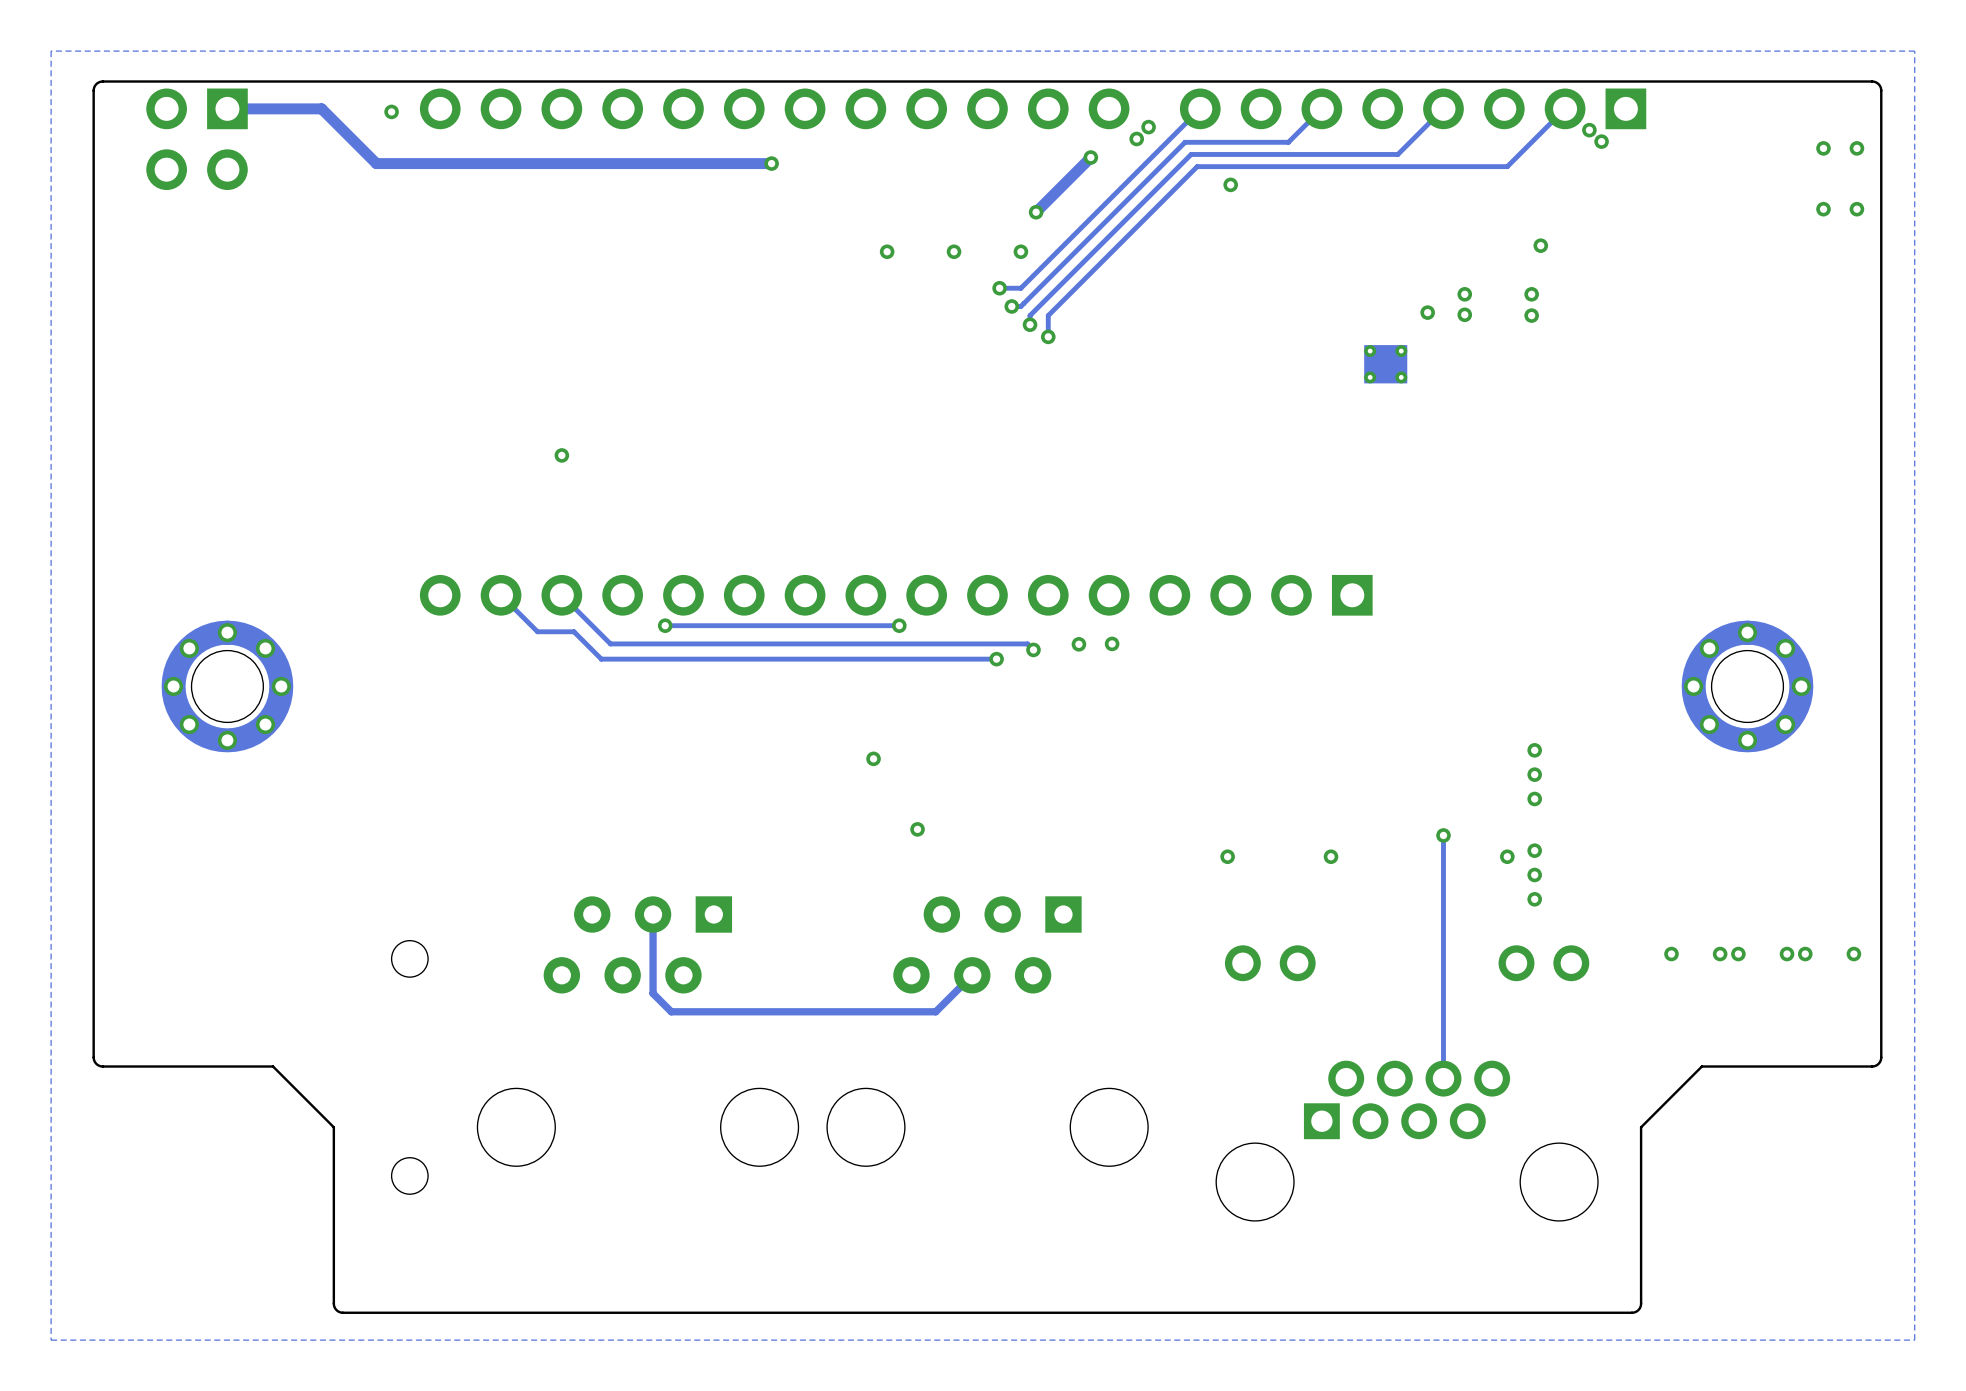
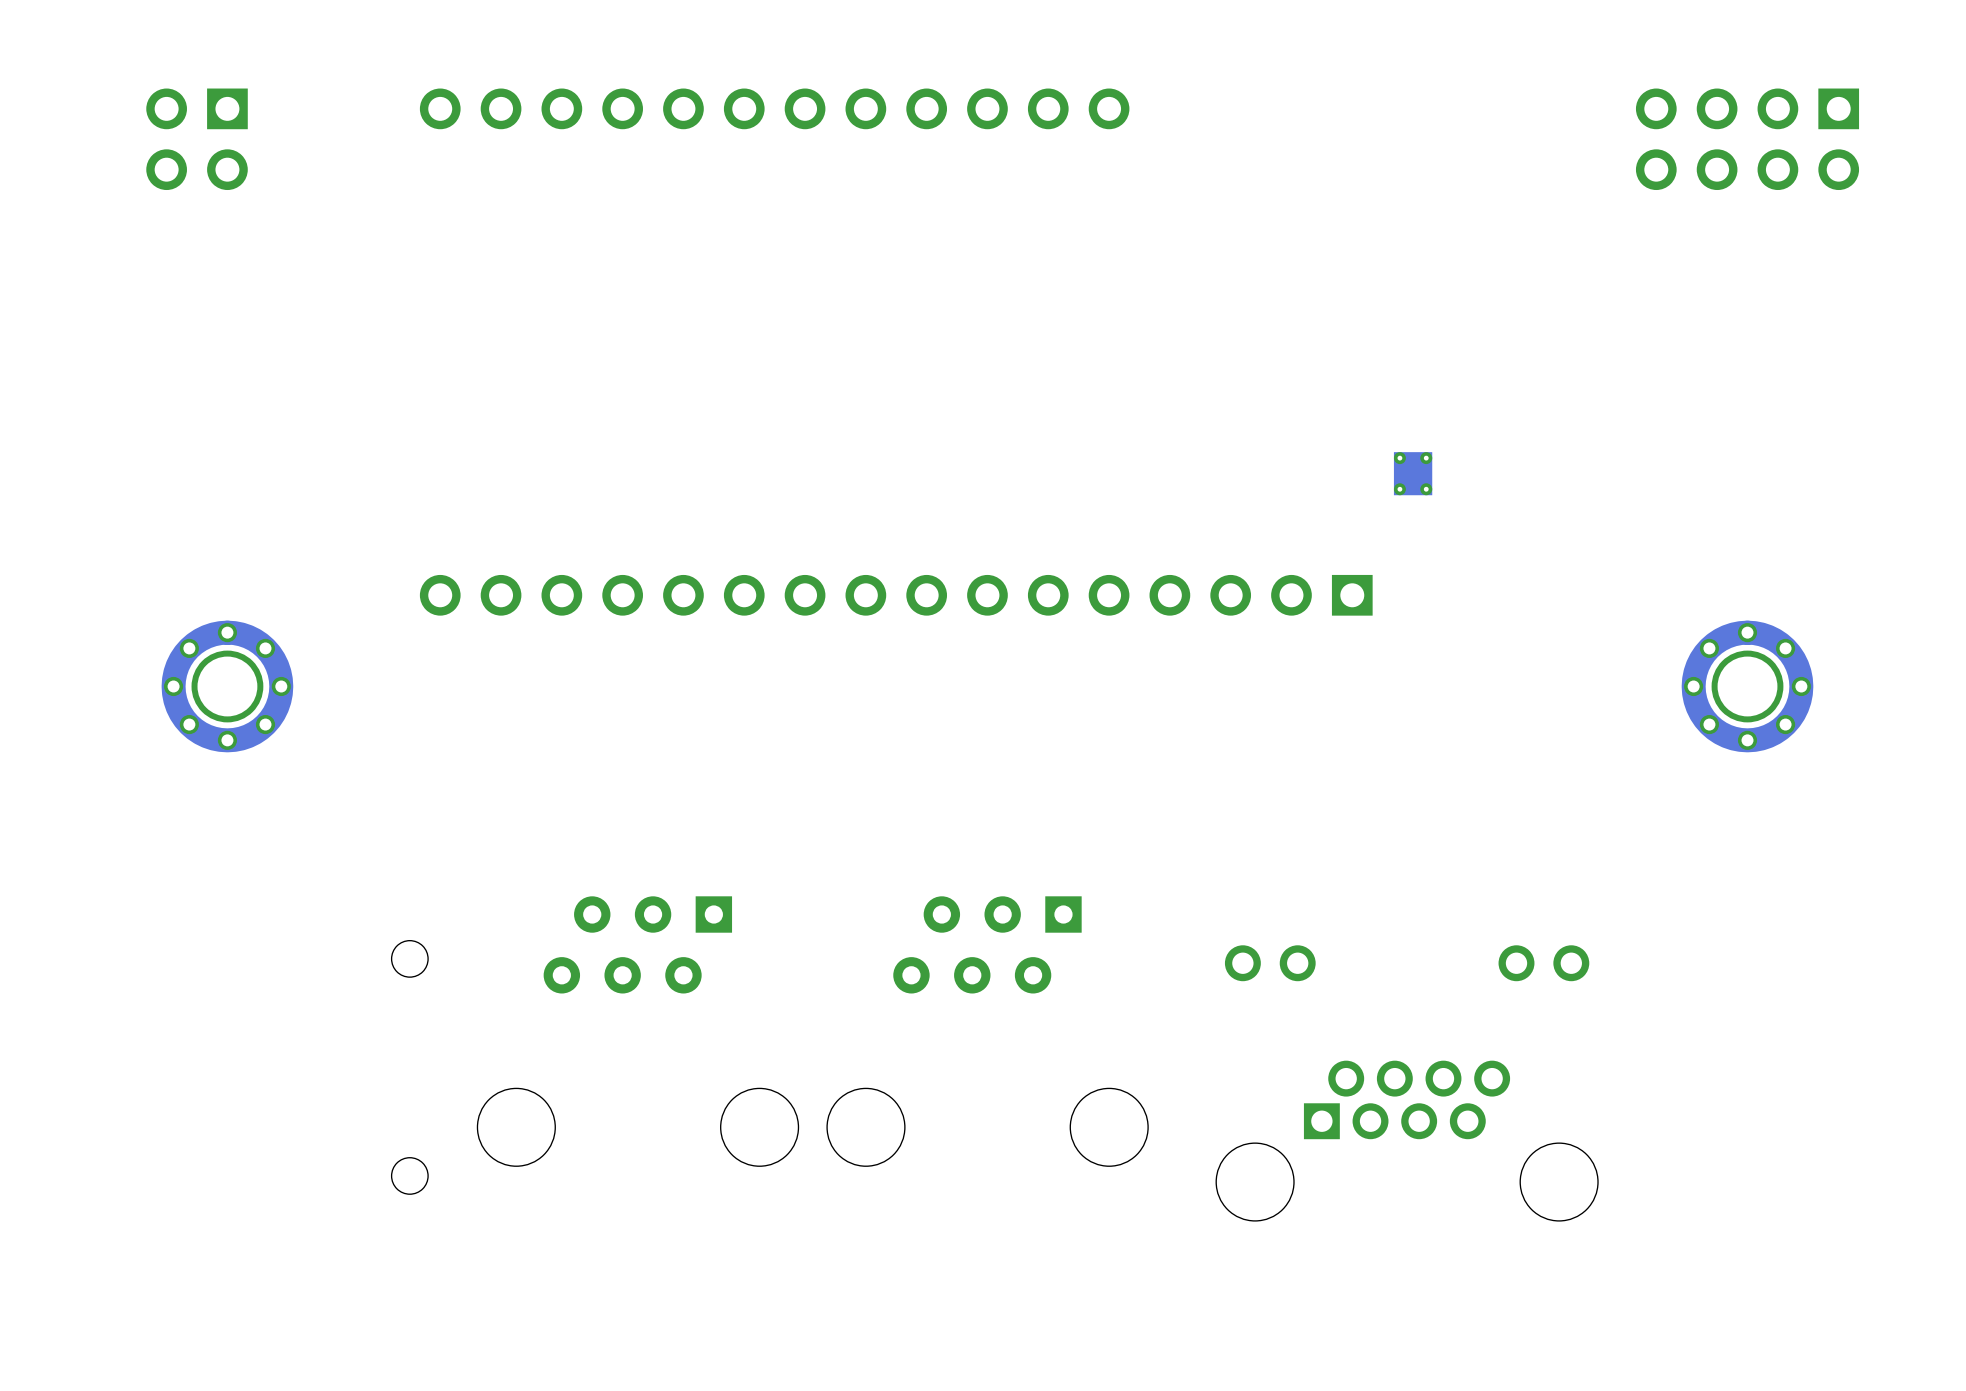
zone outline: (1914, 51) (1914, 1340) (51, 1340) (51, 51) (1914, 51) -> none
board edge: (1872, 81) (98, 82) (93, 90) (94, 1061) (102, 1066) (273, 1066) (333, 1127) (333, 1303) (335, 1309) (341, 1312) (1636, 1311) (1641, 1303) (1641, 1127) (1701, 1066) (1872, 1066) (1878, 1063) (1881, 1058) (1881, 90) (1878, 84) (1872, 81) -> none
track: (227, 108) (321, 108) (376, 163) (771, 163) -> none
track: (1200, 108) (1020, 288) (999, 288) -> none
track: (1321, 108) (1288, 142) (1185, 142) (1020, 306) (1011, 306) -> none
part: (1413, 108) -> none
track: (1443, 108) (1397, 154) (1191, 154) (1030, 315) (1030, 324) -> none
track: (1565, 108) (1507, 166) (1197, 166) (1048, 315) (1048, 336) -> none
via: (391, 111) -> none
via: (1148, 127) -> none
via: (1589, 130) -> none
via: (1136, 138) -> none
part: none -> (1747, 139)
via: (1601, 141) -> none
via: (1823, 148) -> none
via: (1856, 148) -> none
track: (1090, 157) (1036, 212) -> none
via: (1090, 157) -> none
via: (771, 163) -> none
via: (1230, 184) -> none
via: (1823, 209) -> none
via: (1856, 209) -> none
via: (1036, 212) -> none
via: (1540, 245) -> none
via: (887, 251) -> none
via: (954, 251) -> none
via: (1020, 251) -> none
via: (999, 288) -> none
via: (1464, 294) -> none
via: (1531, 294) -> none
via: (1011, 306) -> none
via: (1427, 312) -> none
via: (1464, 314) -> none
via: (1531, 315) -> none
via: (1030, 324) -> none
via: (1048, 336) -> none
part rotation: 0° (1385, 364) -> 90° clockwise (1413, 473)
part position: (1385, 364) -> (1413, 473)
via: (561, 455) -> none
track: (501, 595) (537, 631) (574, 631) (601, 659) (996, 659) -> none
track: (561, 595) (610, 643) (1027, 643) (1033, 649) -> none
part footprint: [161, 620, 294, 753] -> [161, 620, 294, 753]
part footprint: [1681, 620, 1814, 753] -> [1681, 620, 1814, 753]
via: (665, 625) -> none
track: (899, 625) (665, 625) -> none
via: (899, 625) -> none
via: (1112, 643) -> none
via: (1078, 644) -> none
via: (1033, 649) -> none
via: (996, 659) -> none
via: (1534, 750) -> none
via: (873, 758) -> none
via: (1534, 774) -> none
via: (1534, 798) -> none
via: (917, 829) -> none
track: (1443, 835) (1443, 1084) -> none
via: (1443, 835) -> none
via: (1534, 850) -> none
via: (1227, 856) -> none
via: (1331, 856) -> none
via: (1507, 856) -> none
via: (1534, 874) -> none
via: (1534, 899) -> none
track: (653, 914) (653, 993) (671, 1011) (935, 1011) (972, 975) -> none
via: (1671, 954) -> none
via: (1720, 954) -> none
via: (1738, 954) -> none
via: (1787, 954) -> none
via: (1805, 954) -> none
via: (1853, 954) -> none

